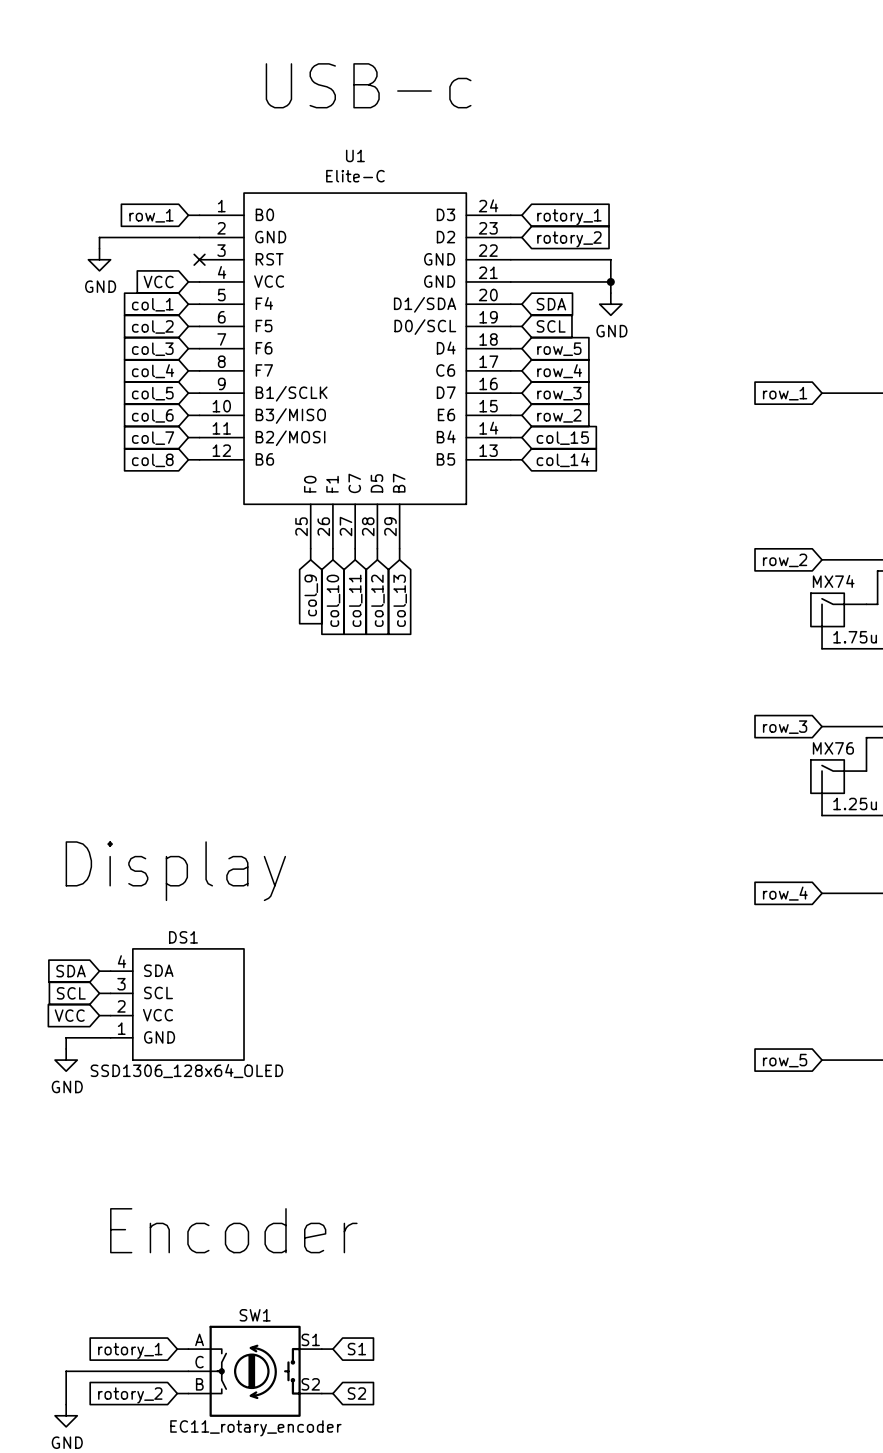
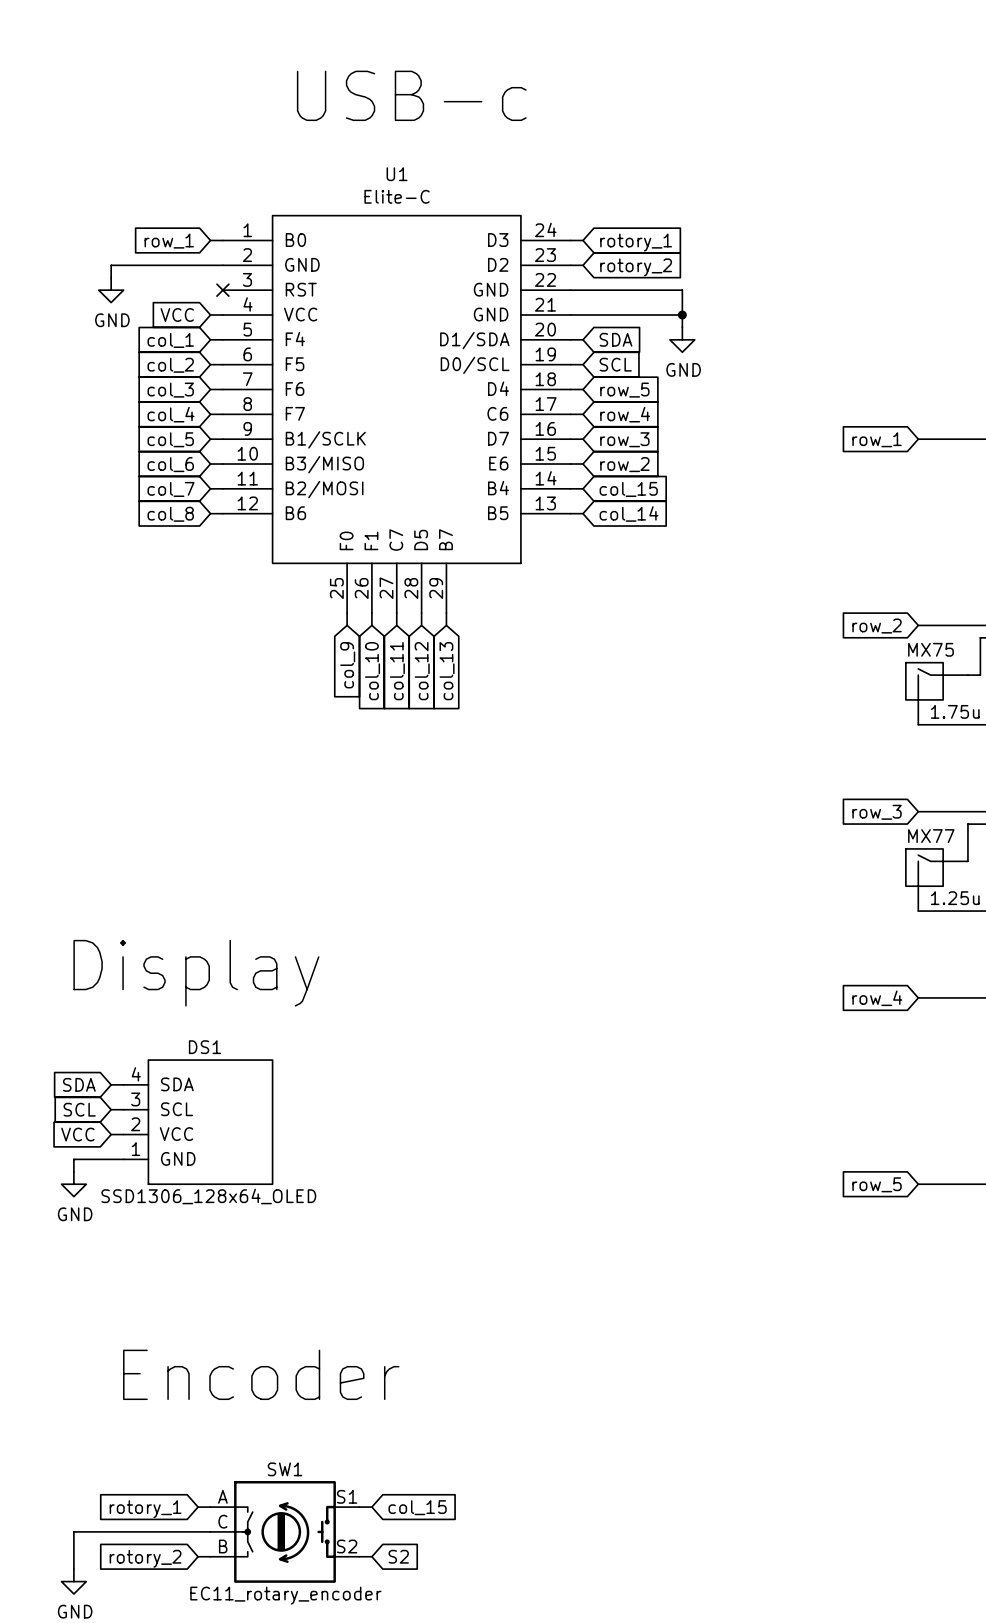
MX74 name: MX74 (833, 581) -> MX75 (931, 649)
MX76 name: MX76 (833, 748) -> MX77 (931, 836)
global label: S1 (356, 1349) -> col_15 (417, 1507)

